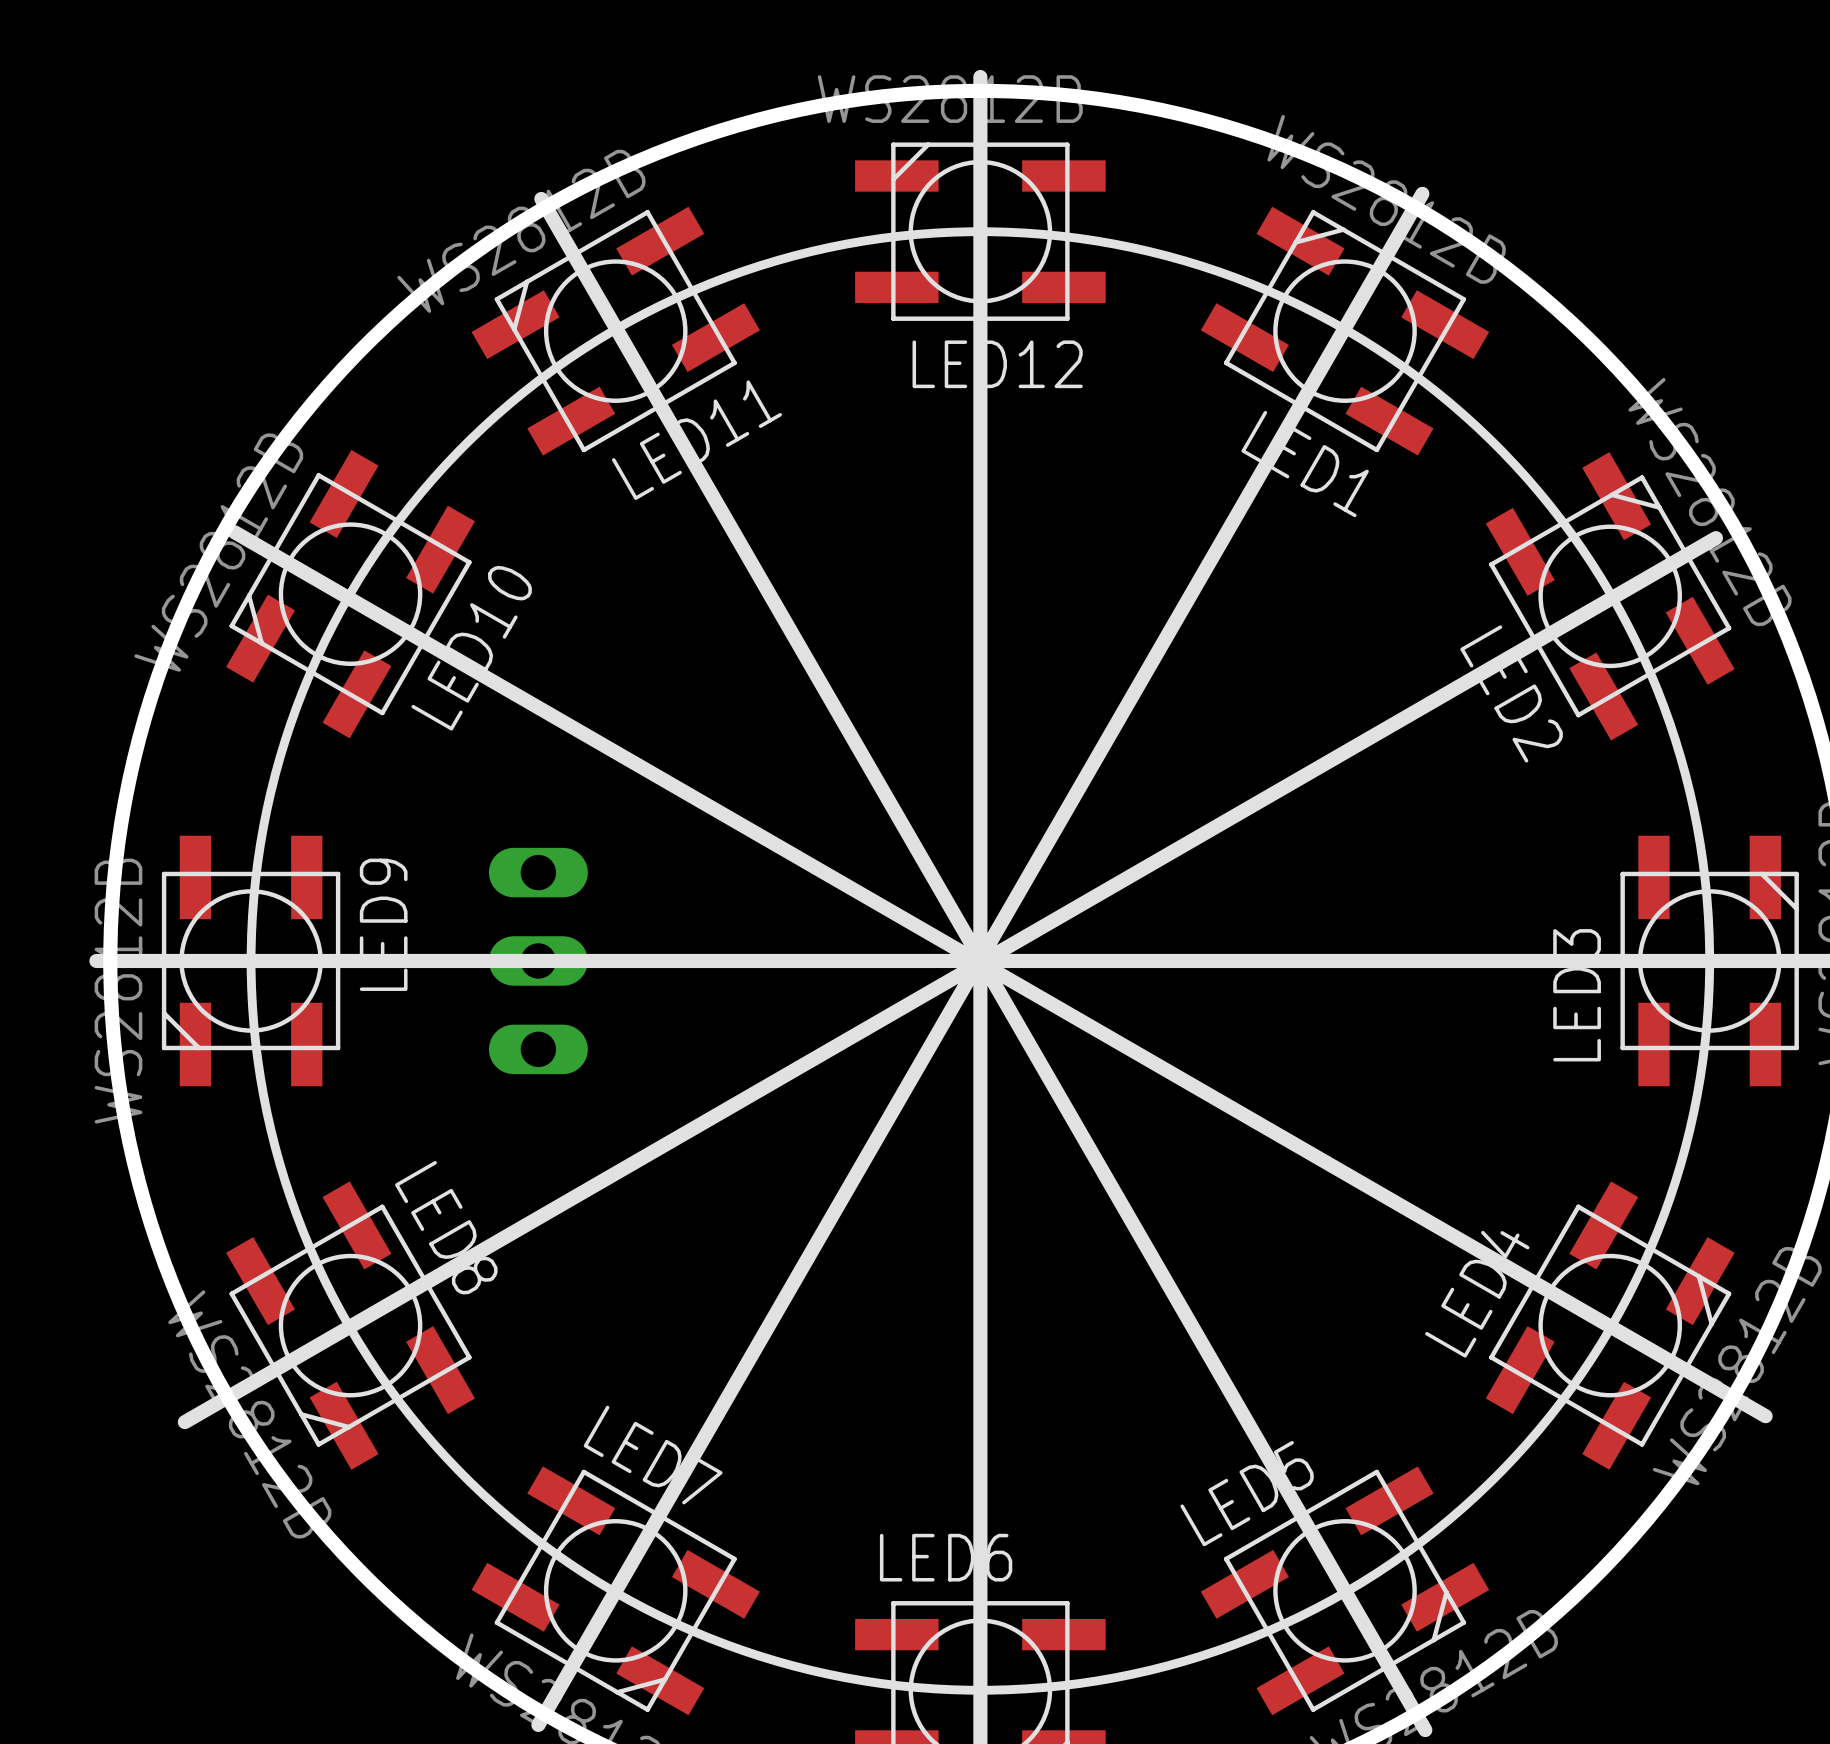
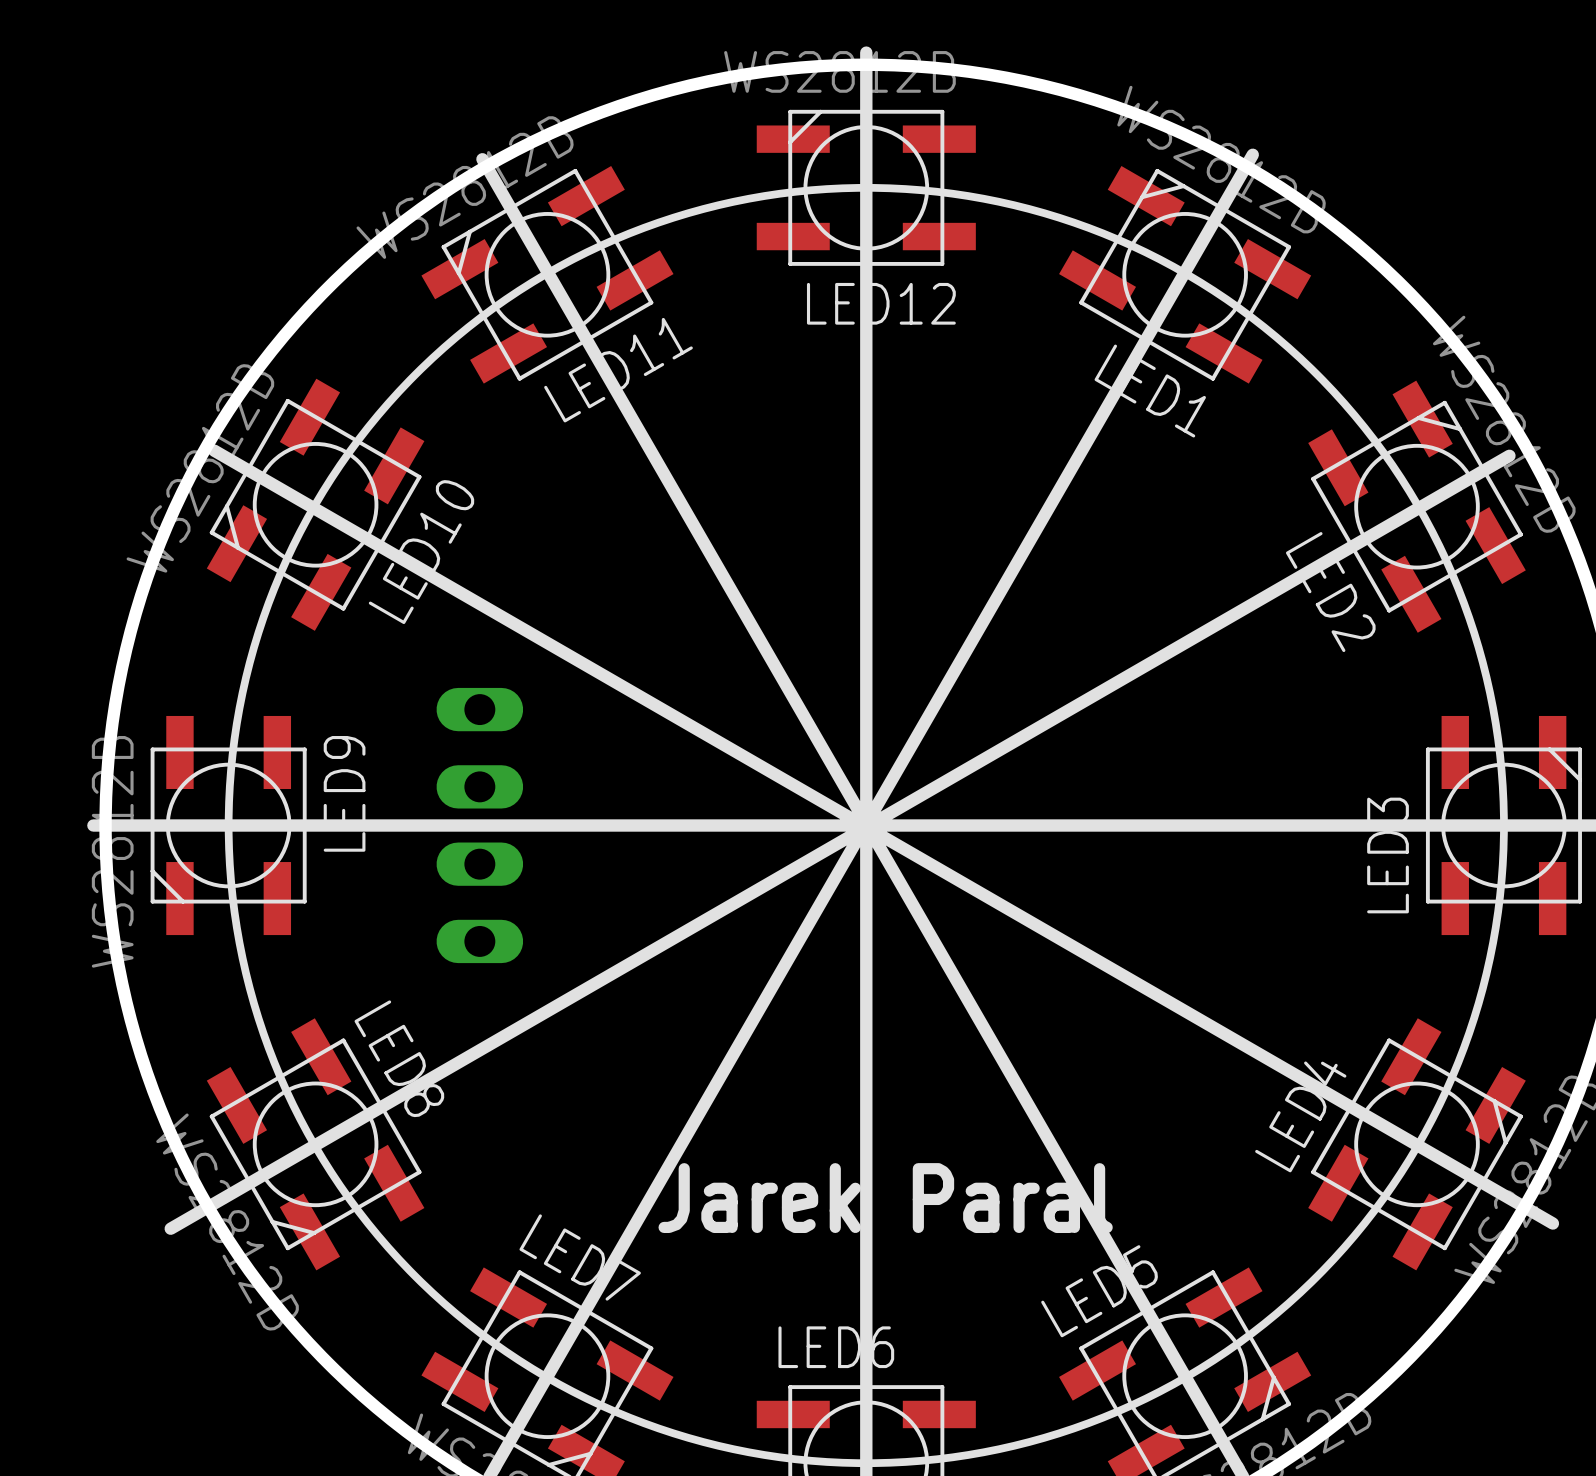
part footprint: [488, 847, 588, 1075] -> [436, 687, 524, 964]
text: none -> Jarek Paral (885, 1198)

